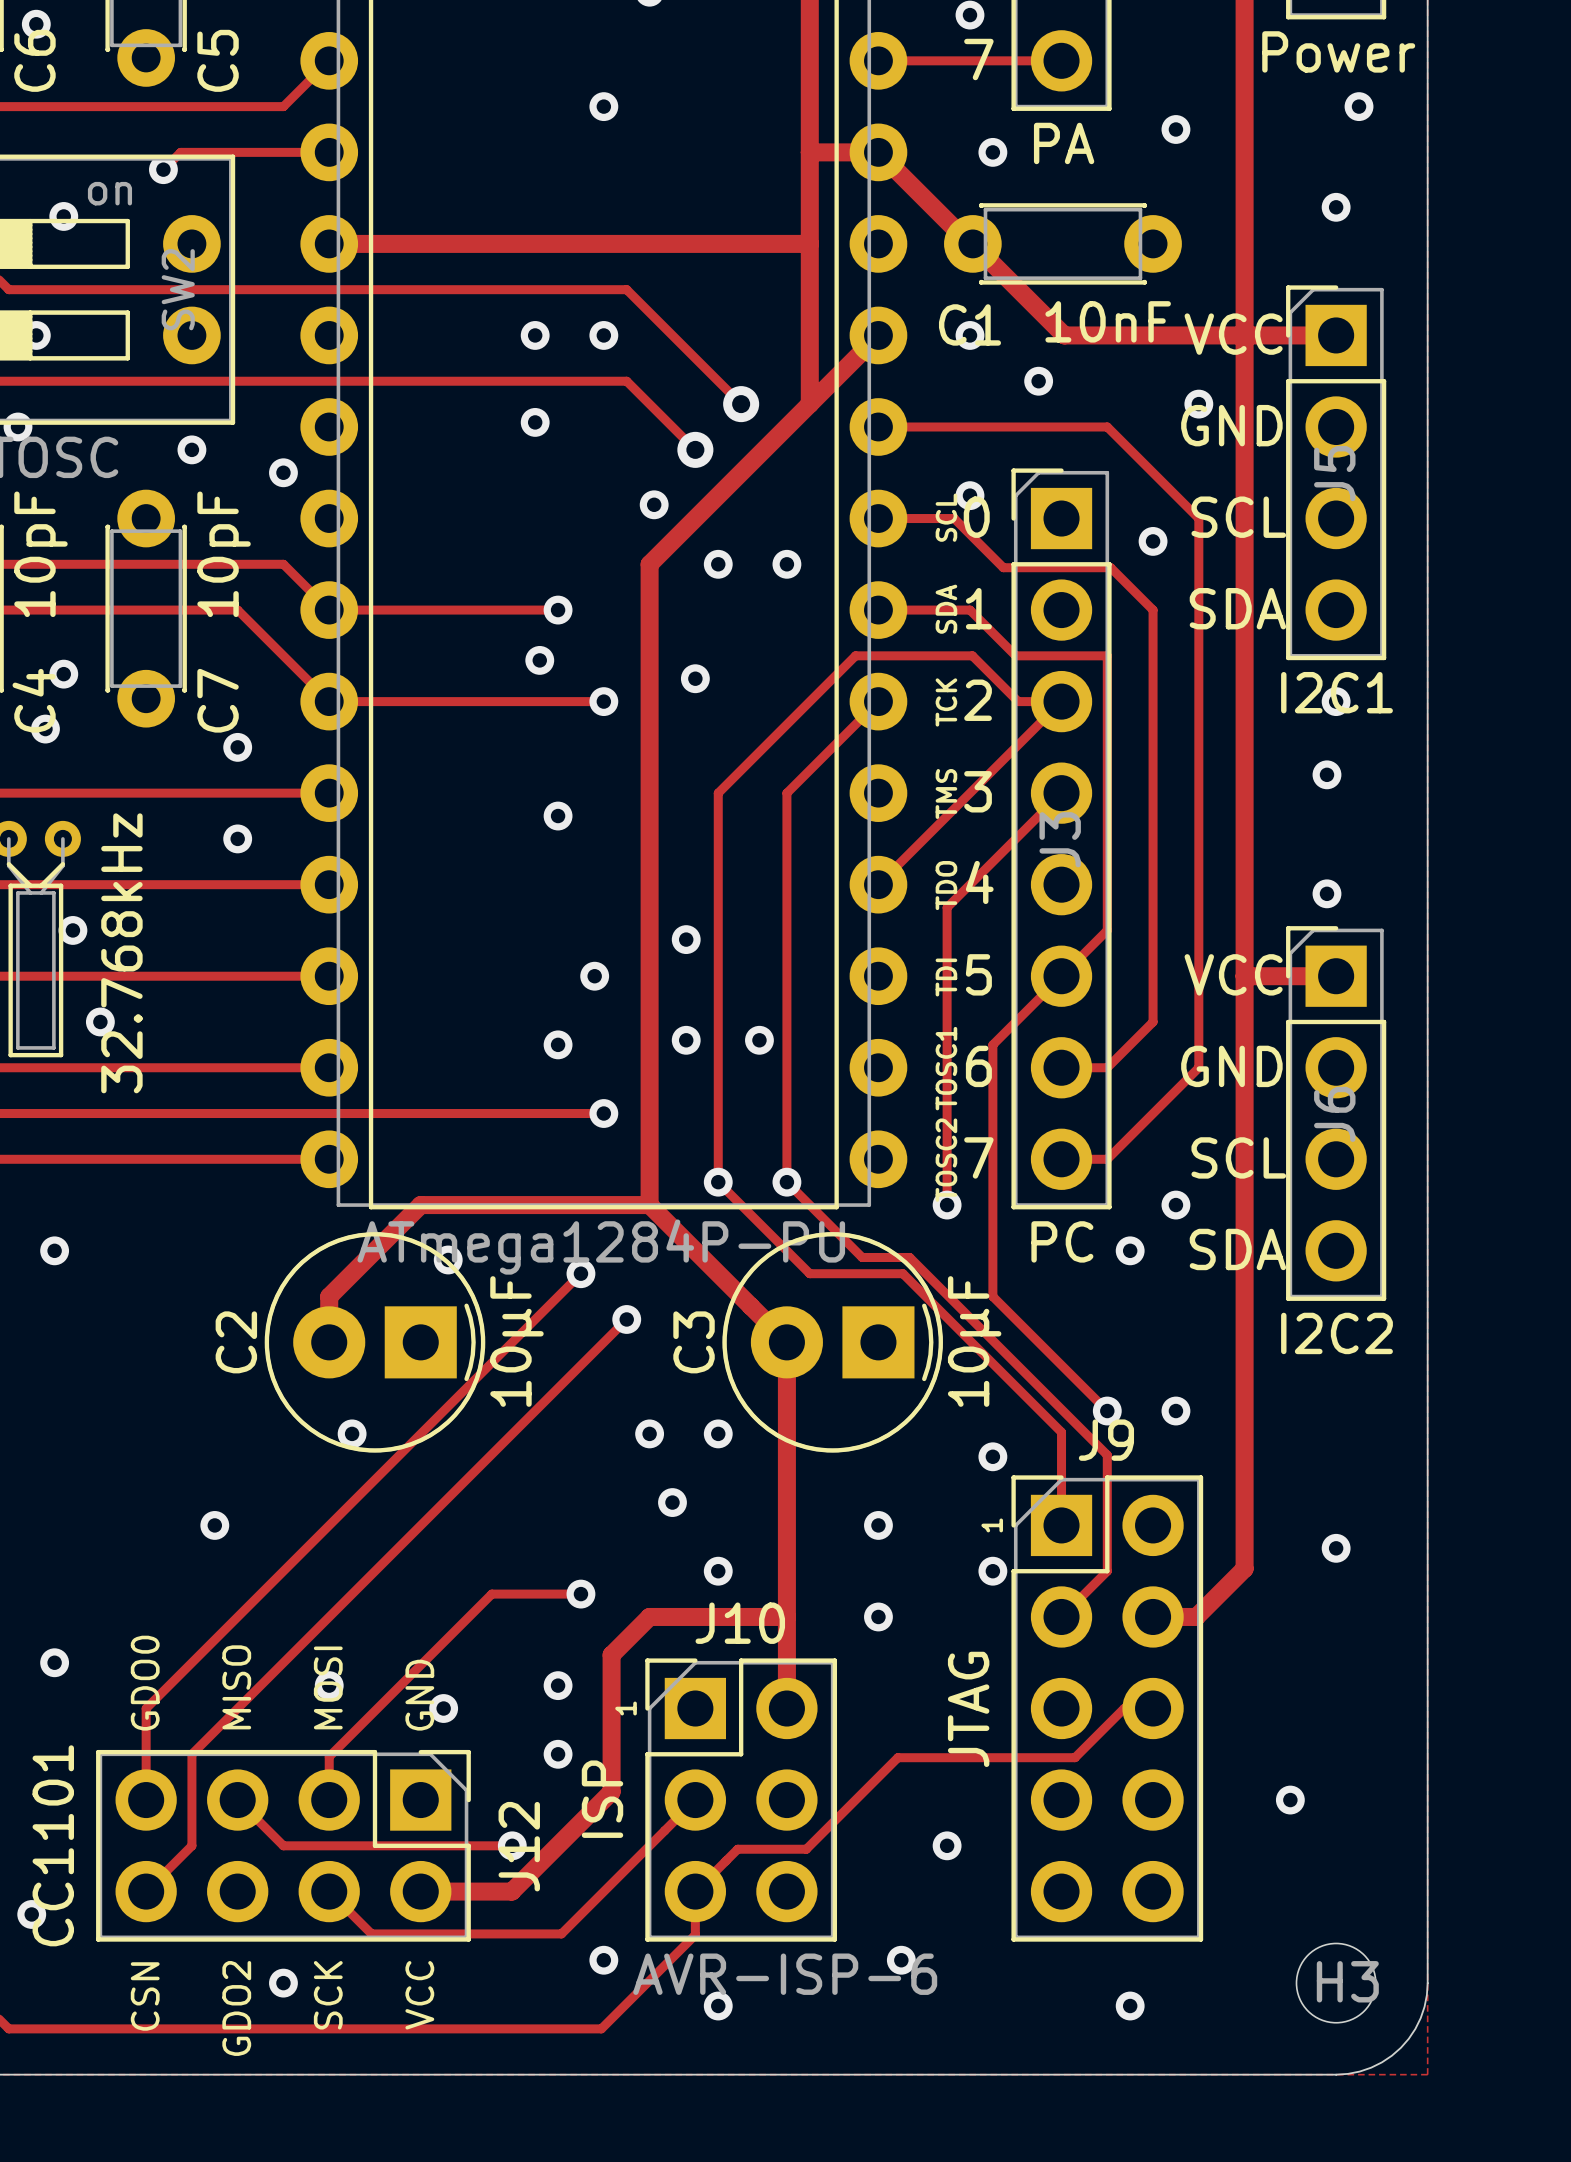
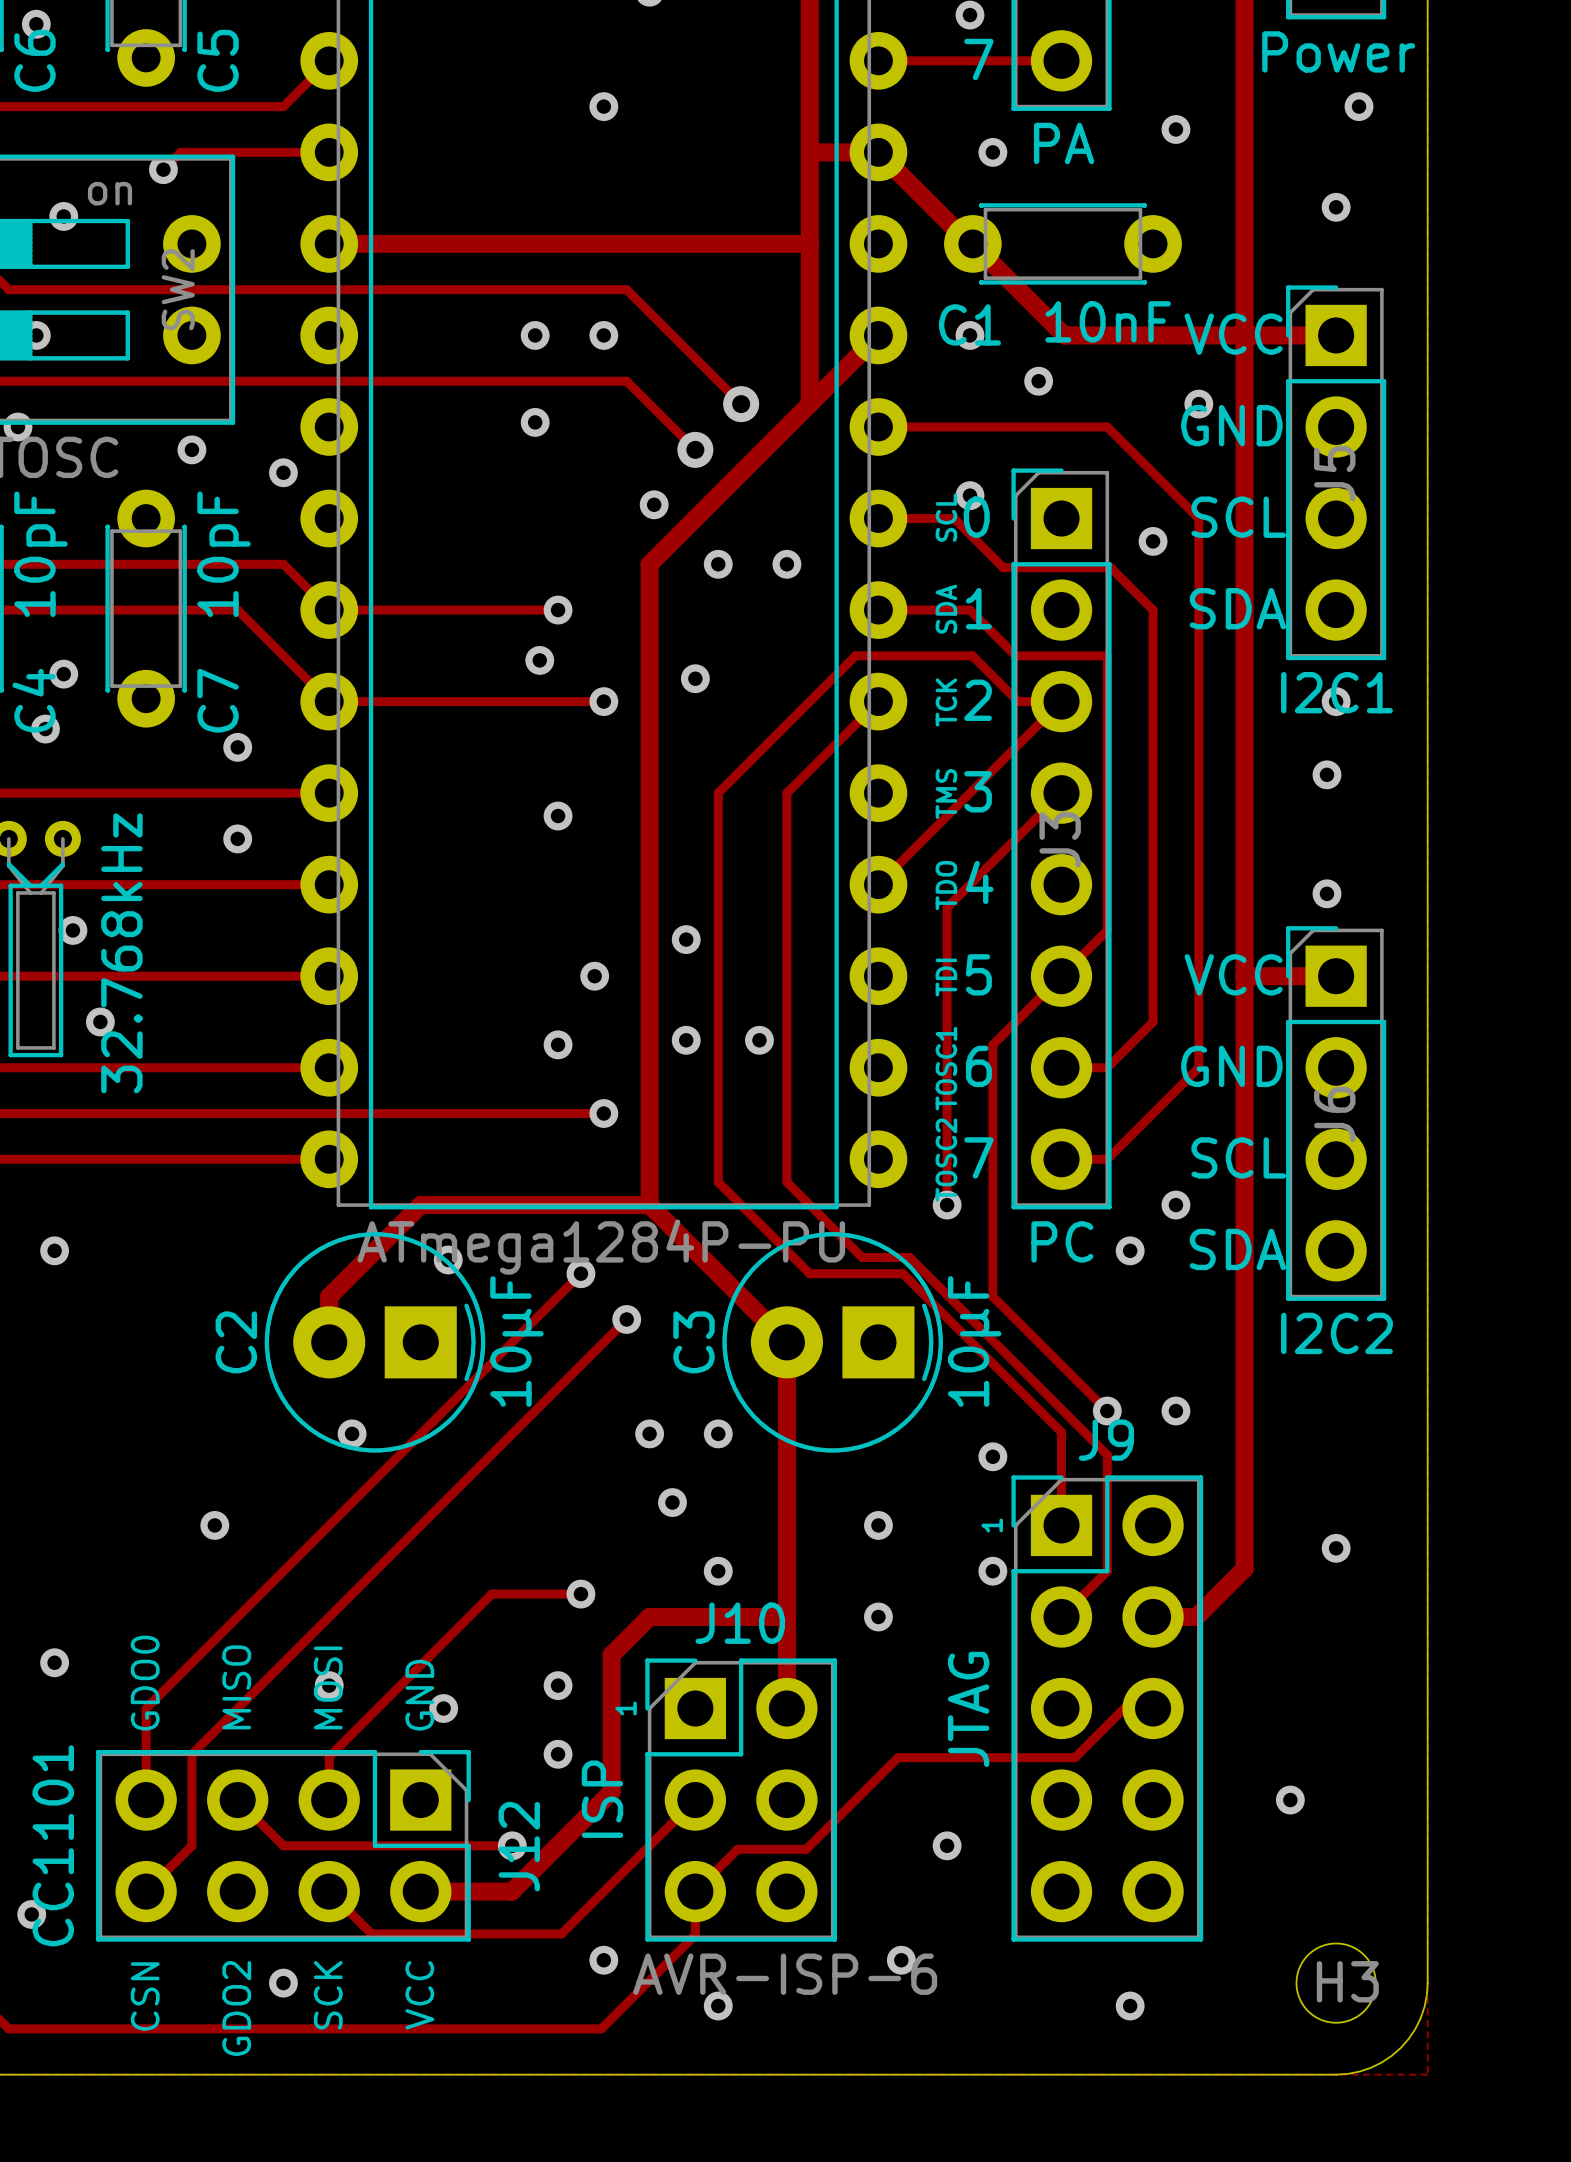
via: (718, 1182) -> none
via: (786, 1182) -> none

